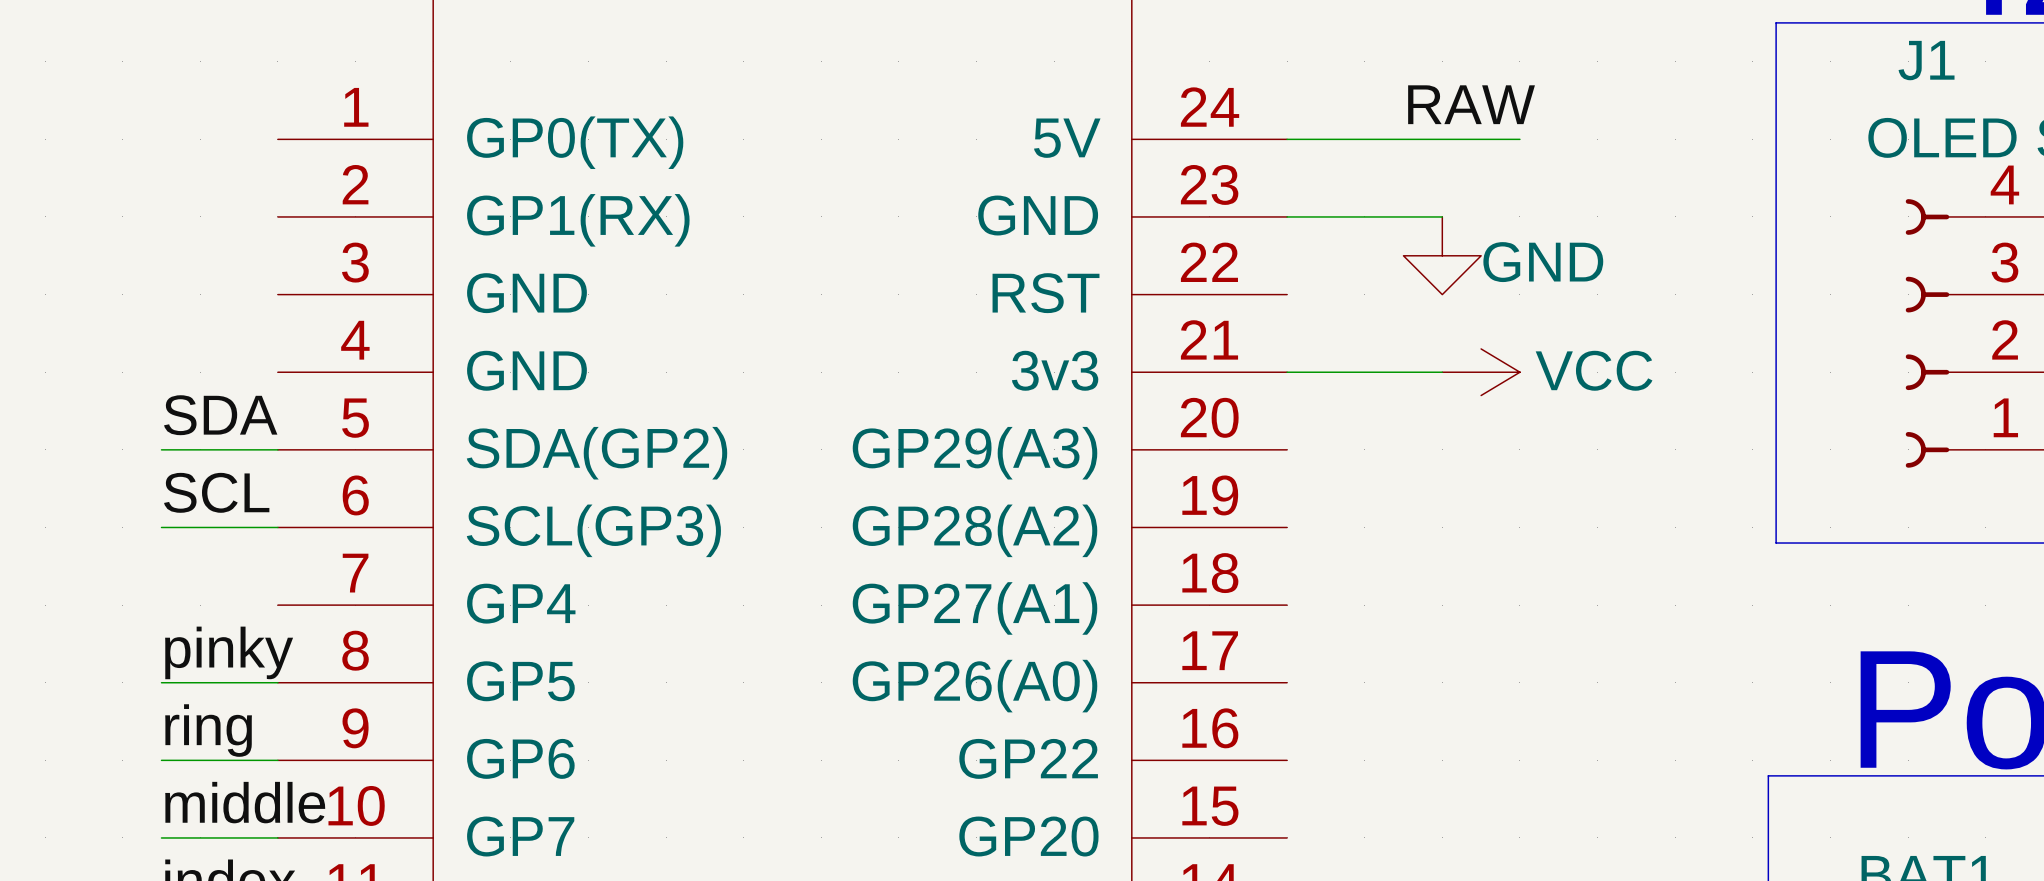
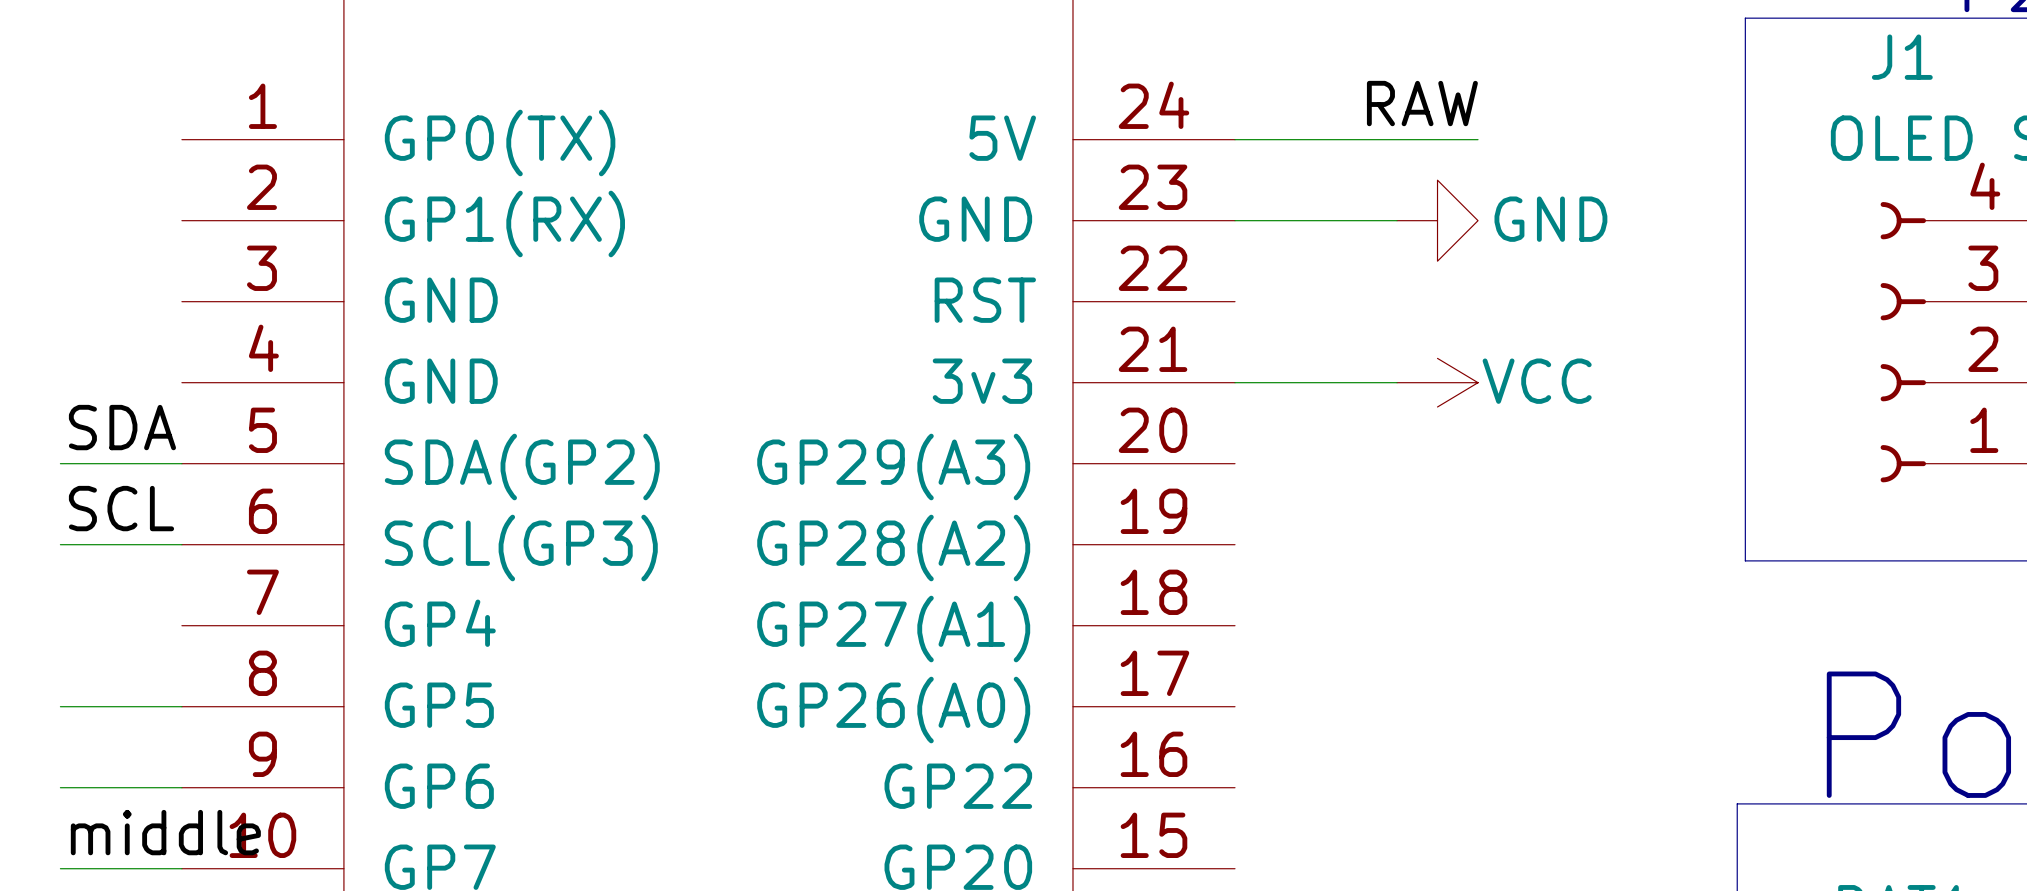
power symbol rotation: 0° (1442, 255) -> 90° counterclockwise (1437, 220)
power symbol position: GND (1442, 255) -> GND (1437, 220)
power symbol text position: VCC (1594, 370) -> VCC (1537, 381)
label: pinky (229, 652) -> none
label: ring (208, 730) -> none

